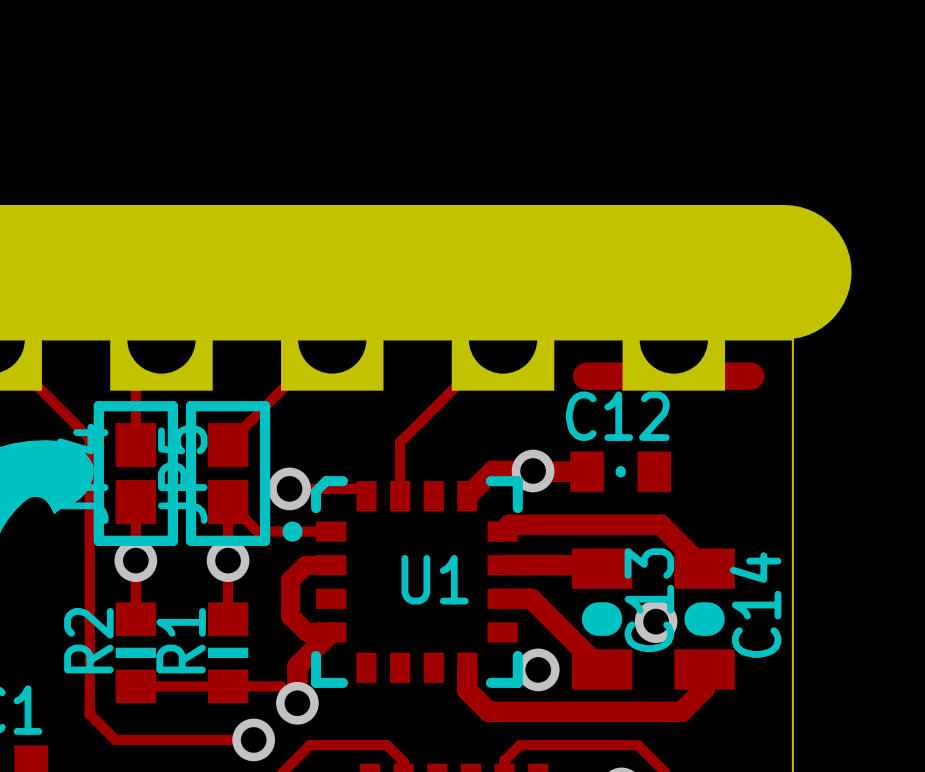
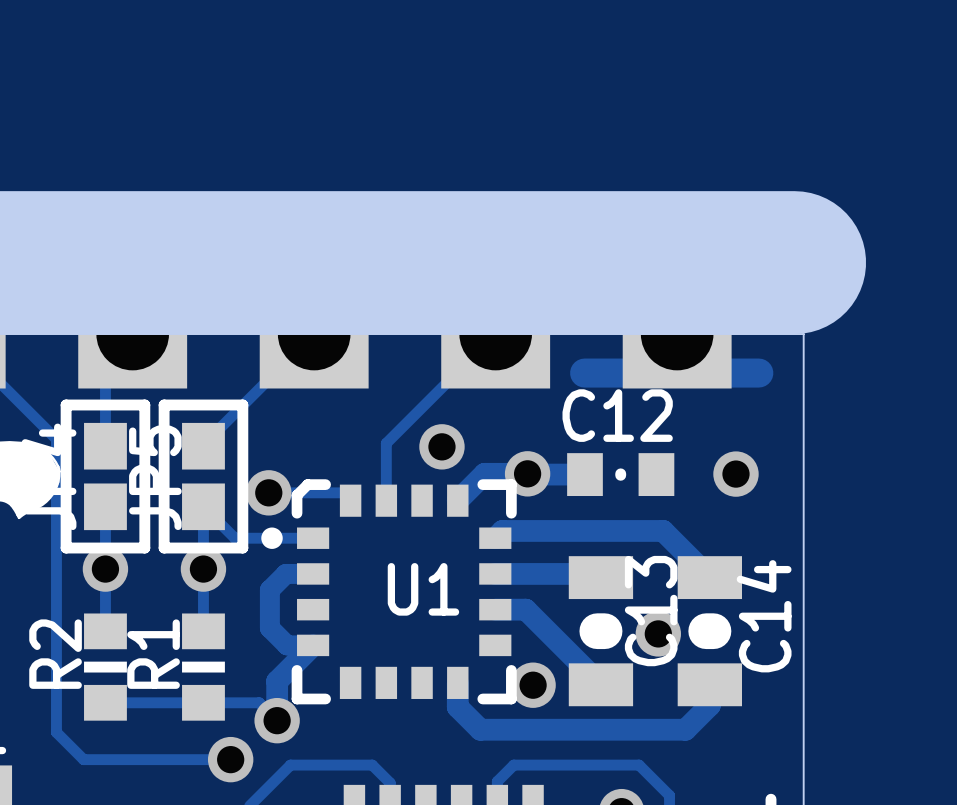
via: none -> (441, 446)
via: none -> (735, 474)

